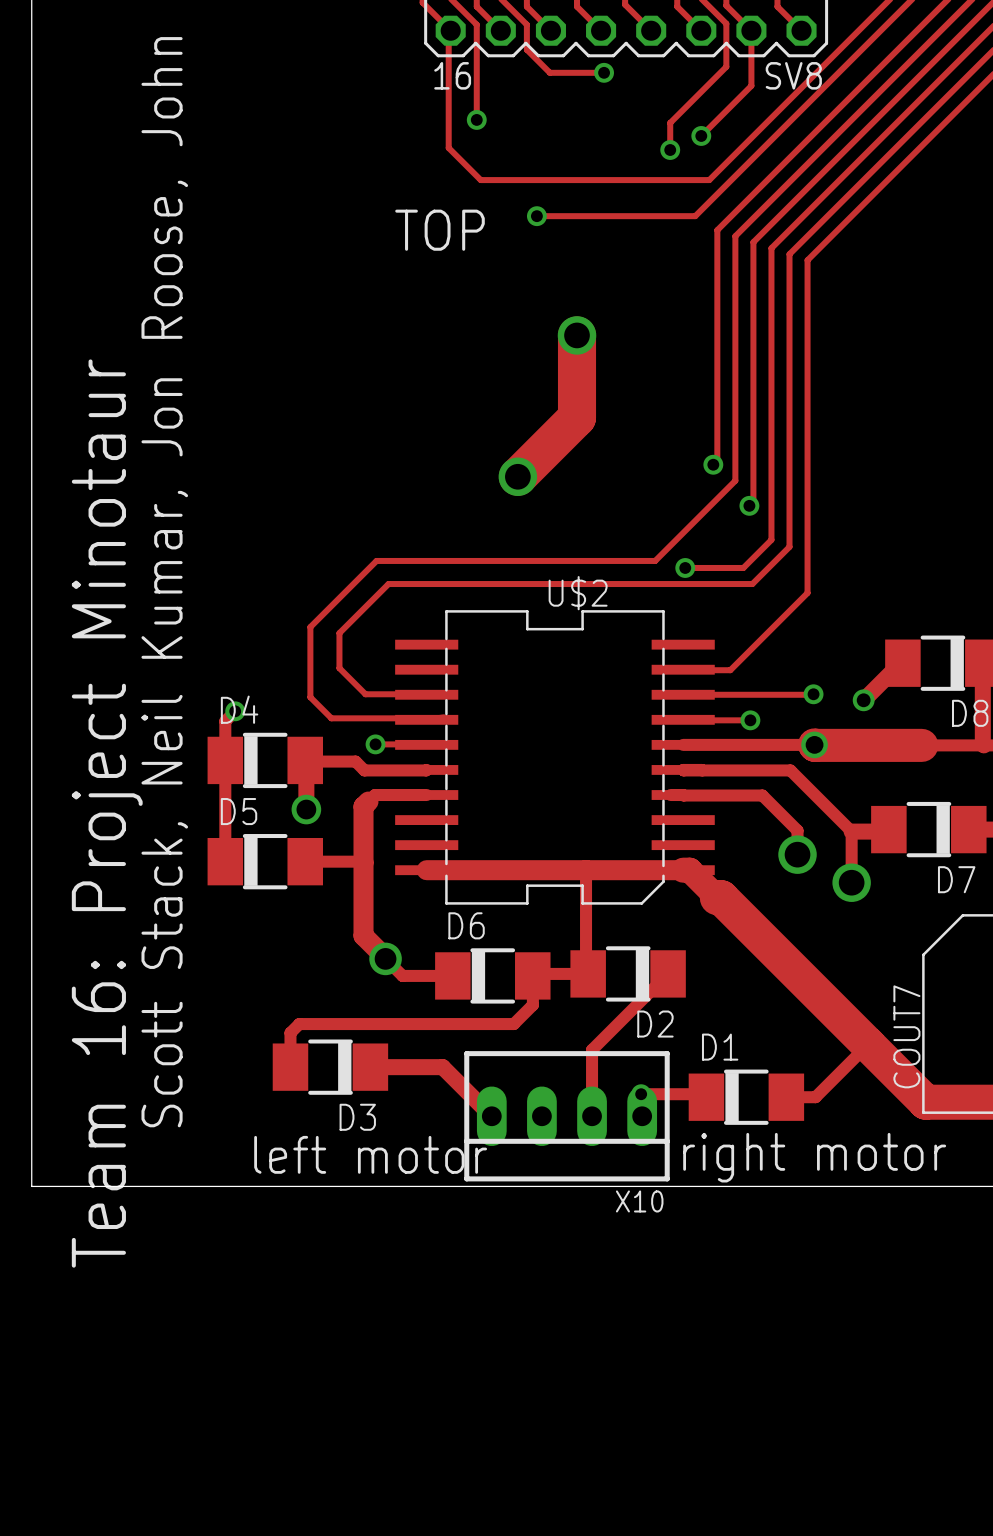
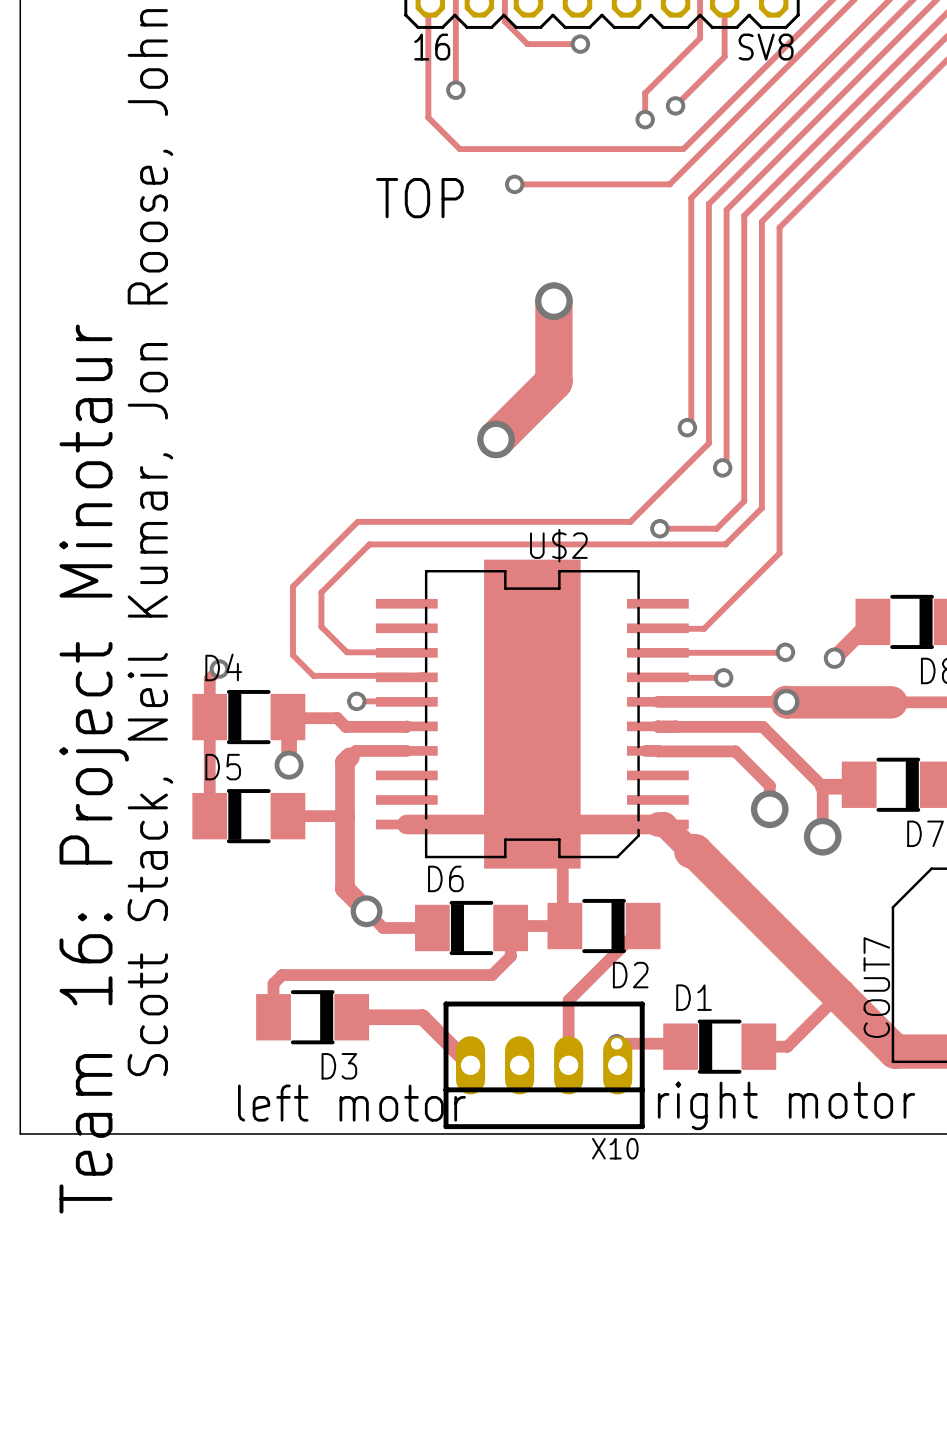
U$2 footprint: [395, 610, 715, 905] -> [375, 559, 689, 869]

